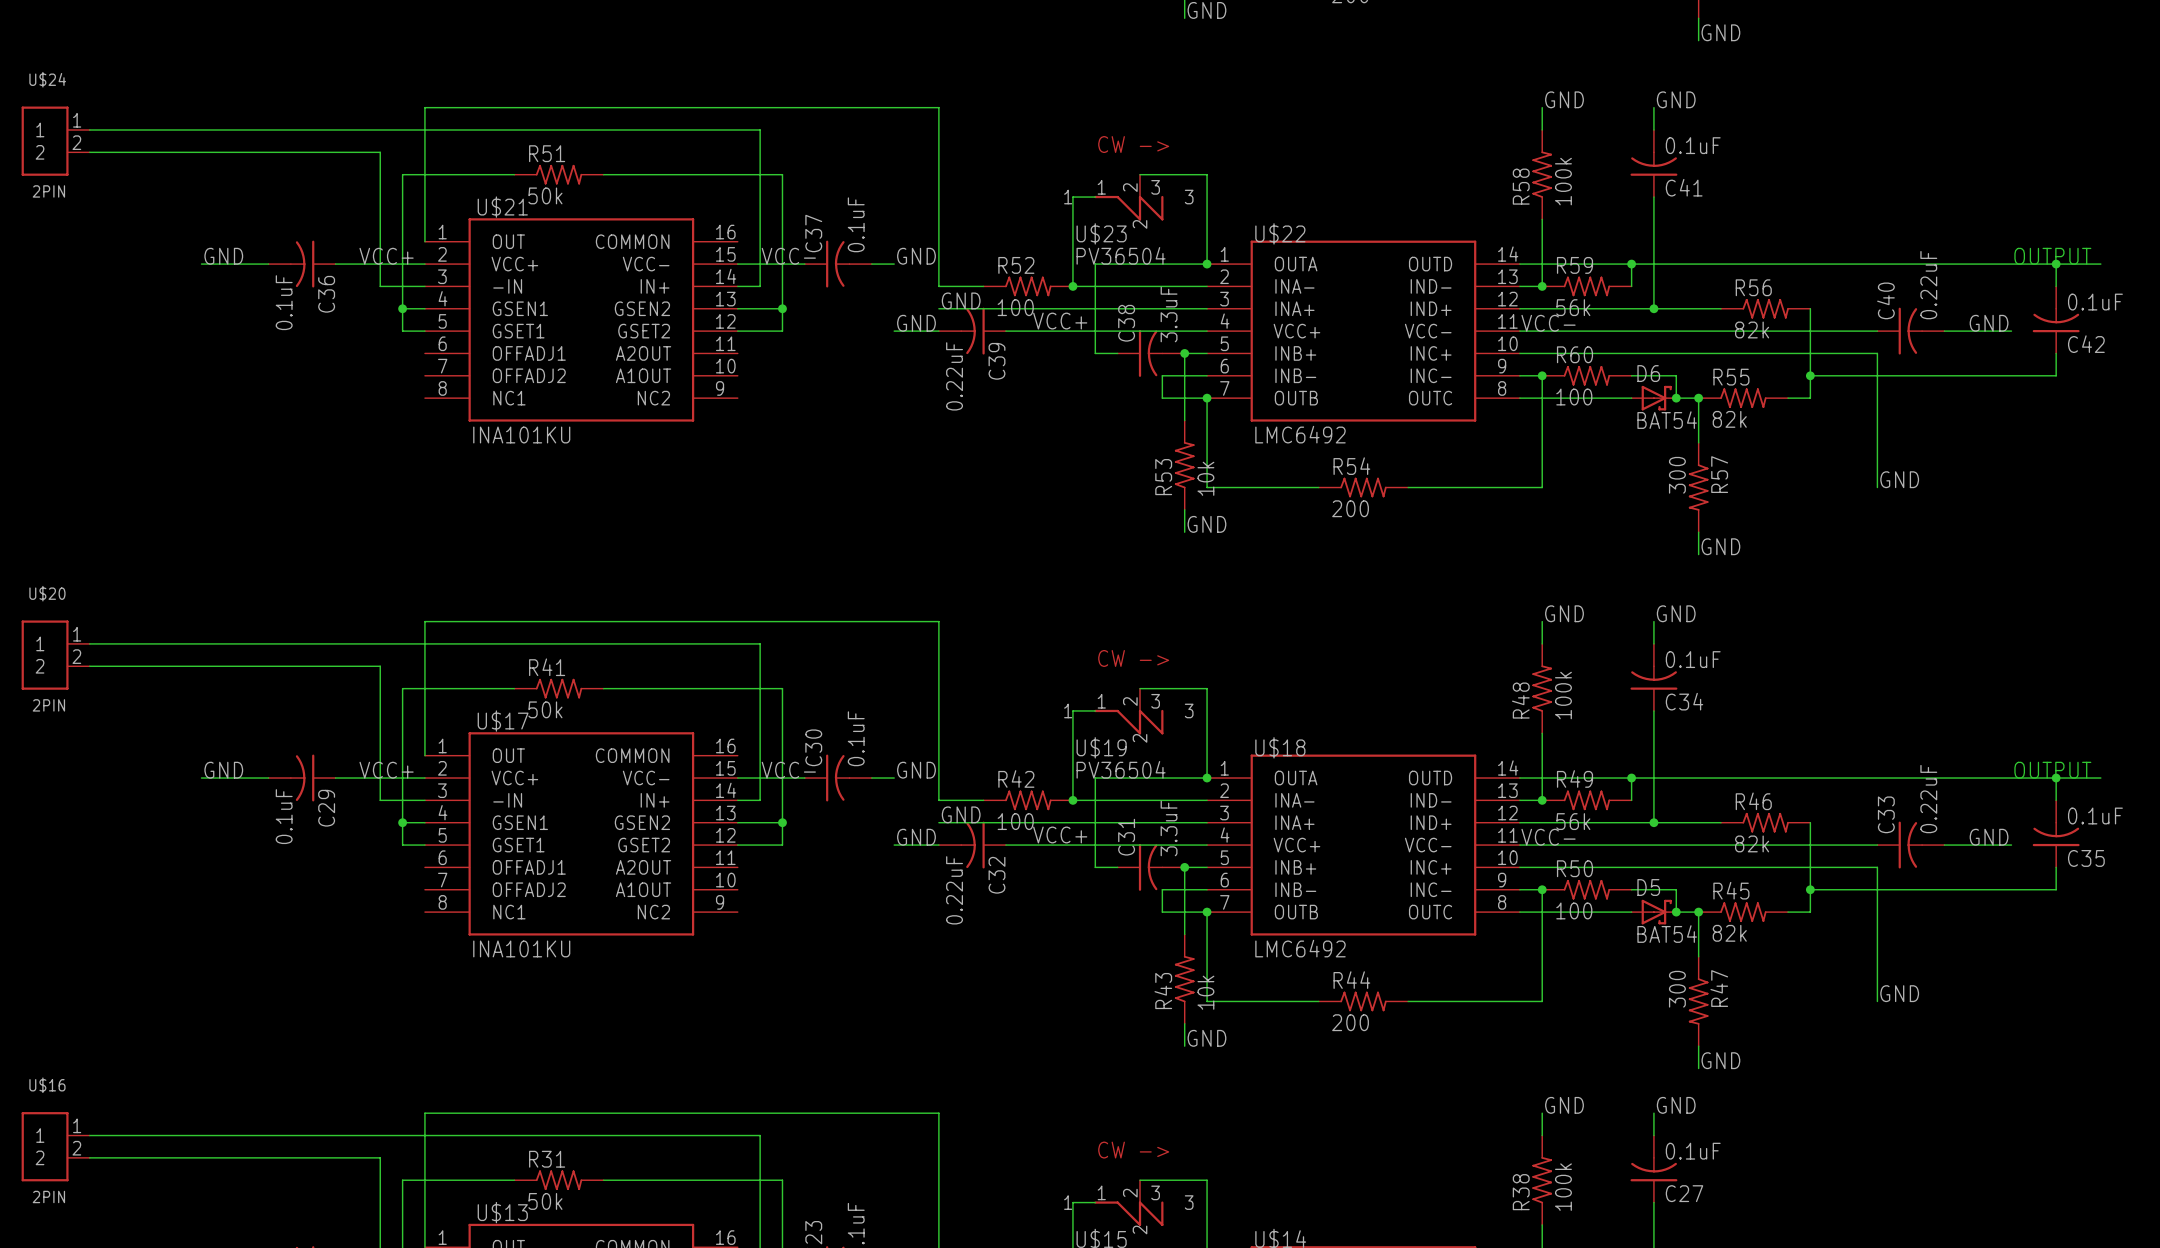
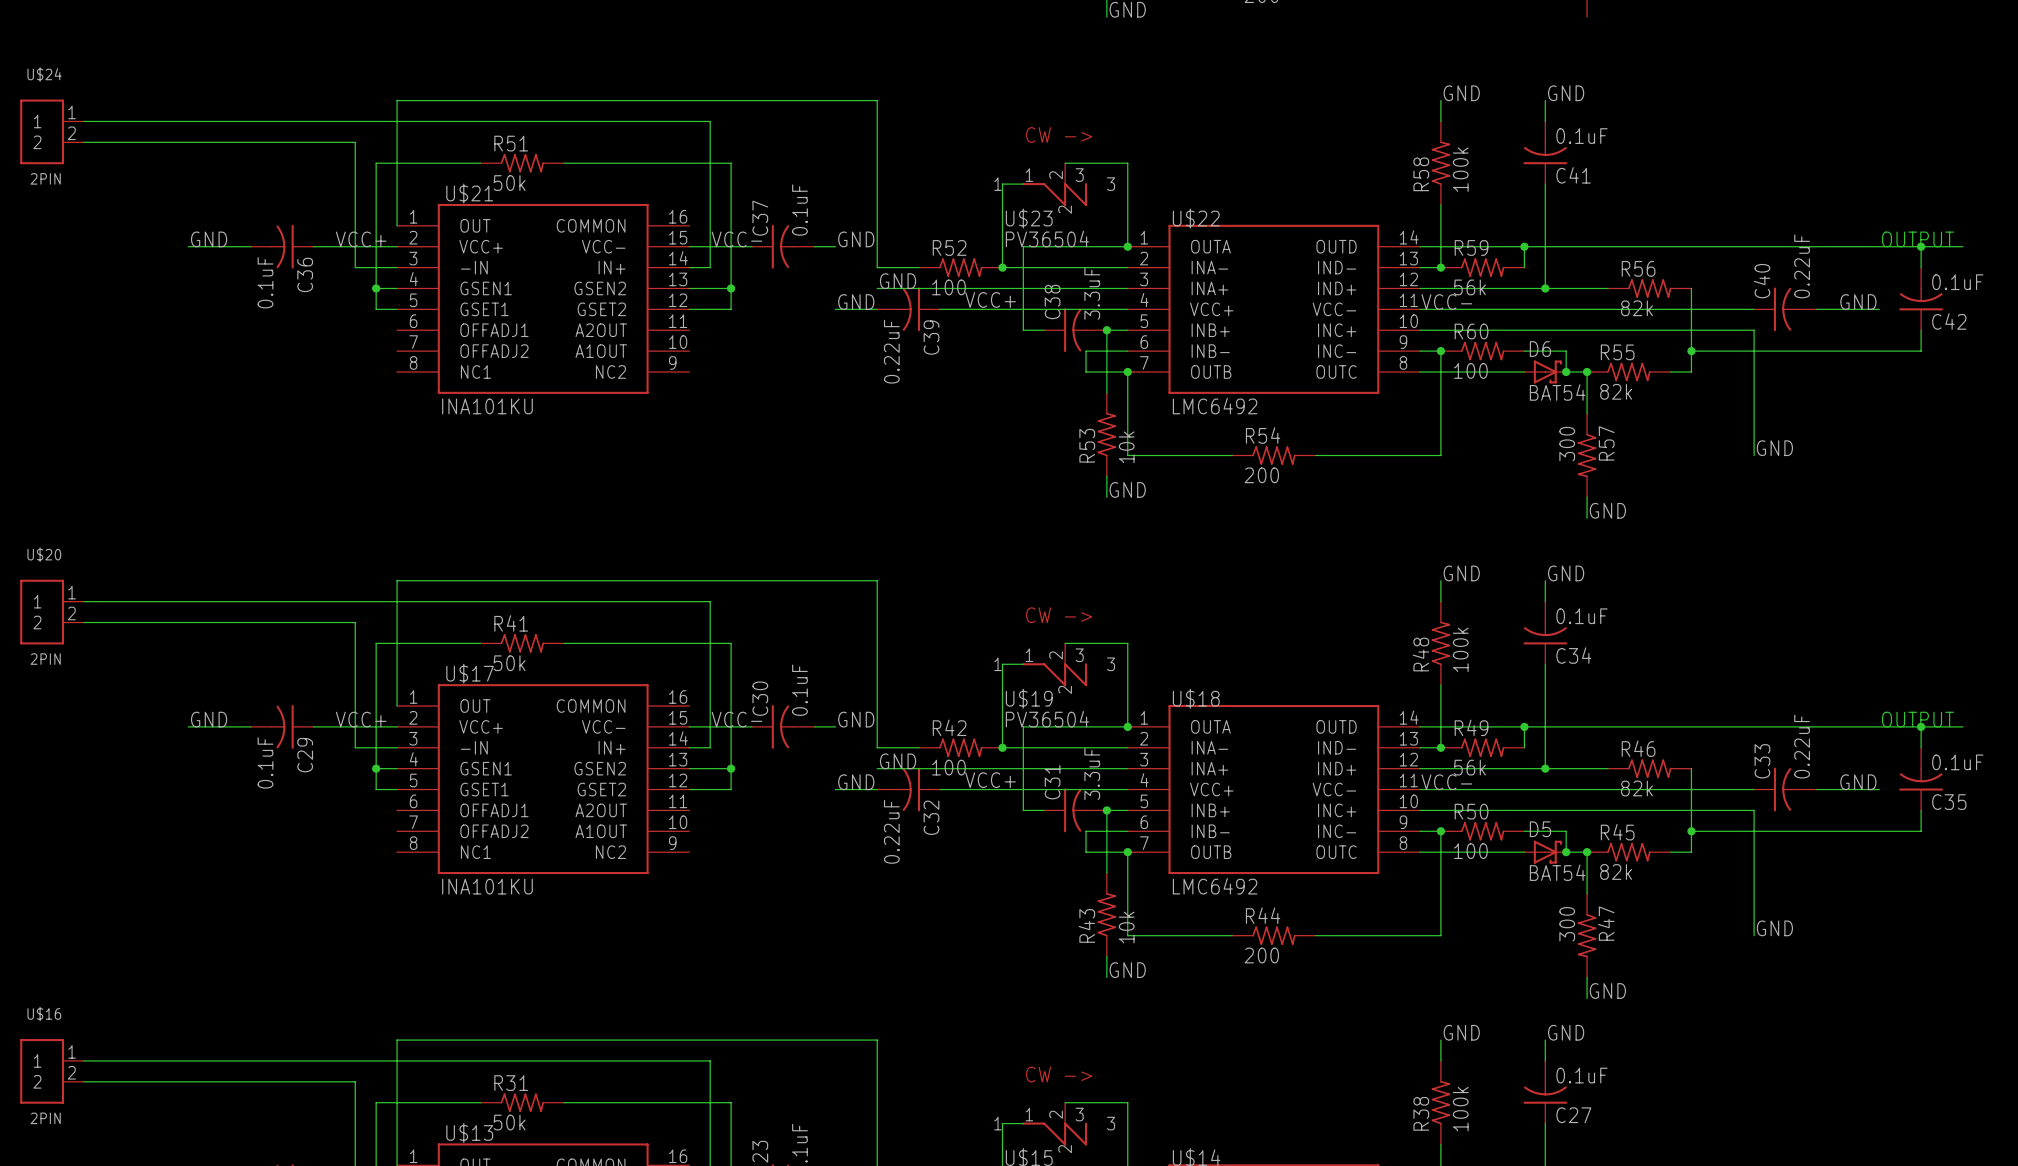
wire: (1698, 18) (1698, 40) -> none
label: GND (1720, 32) -> none

